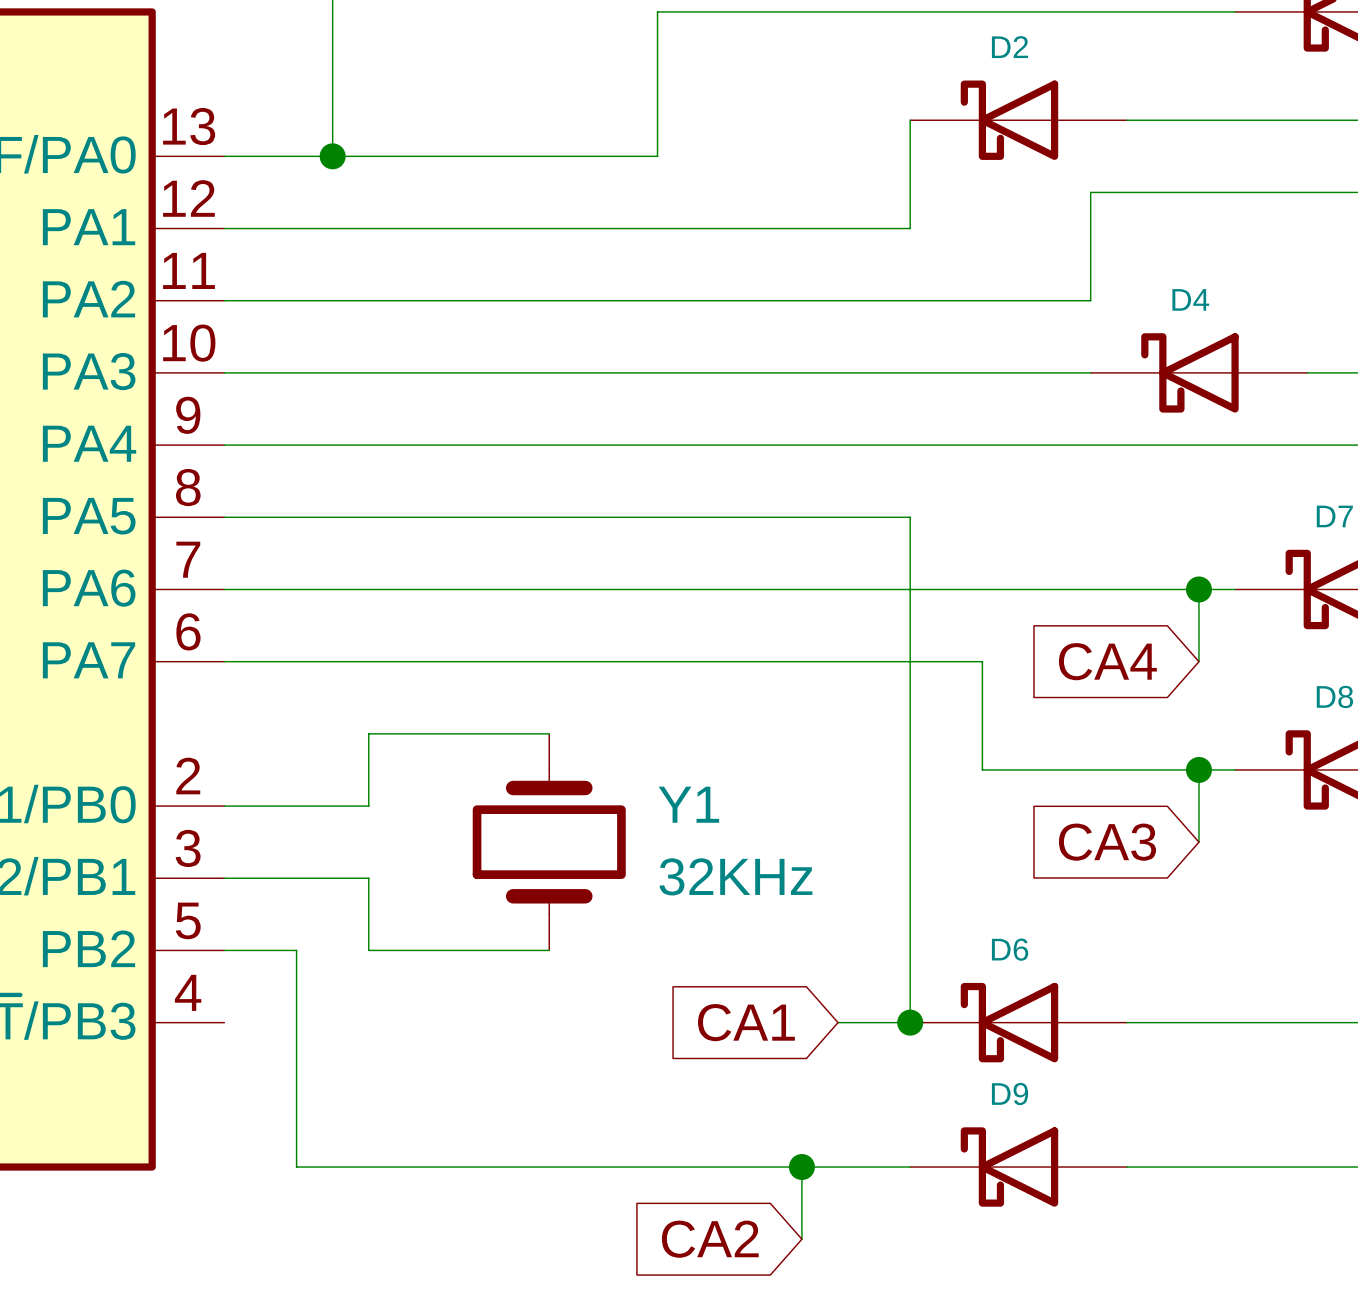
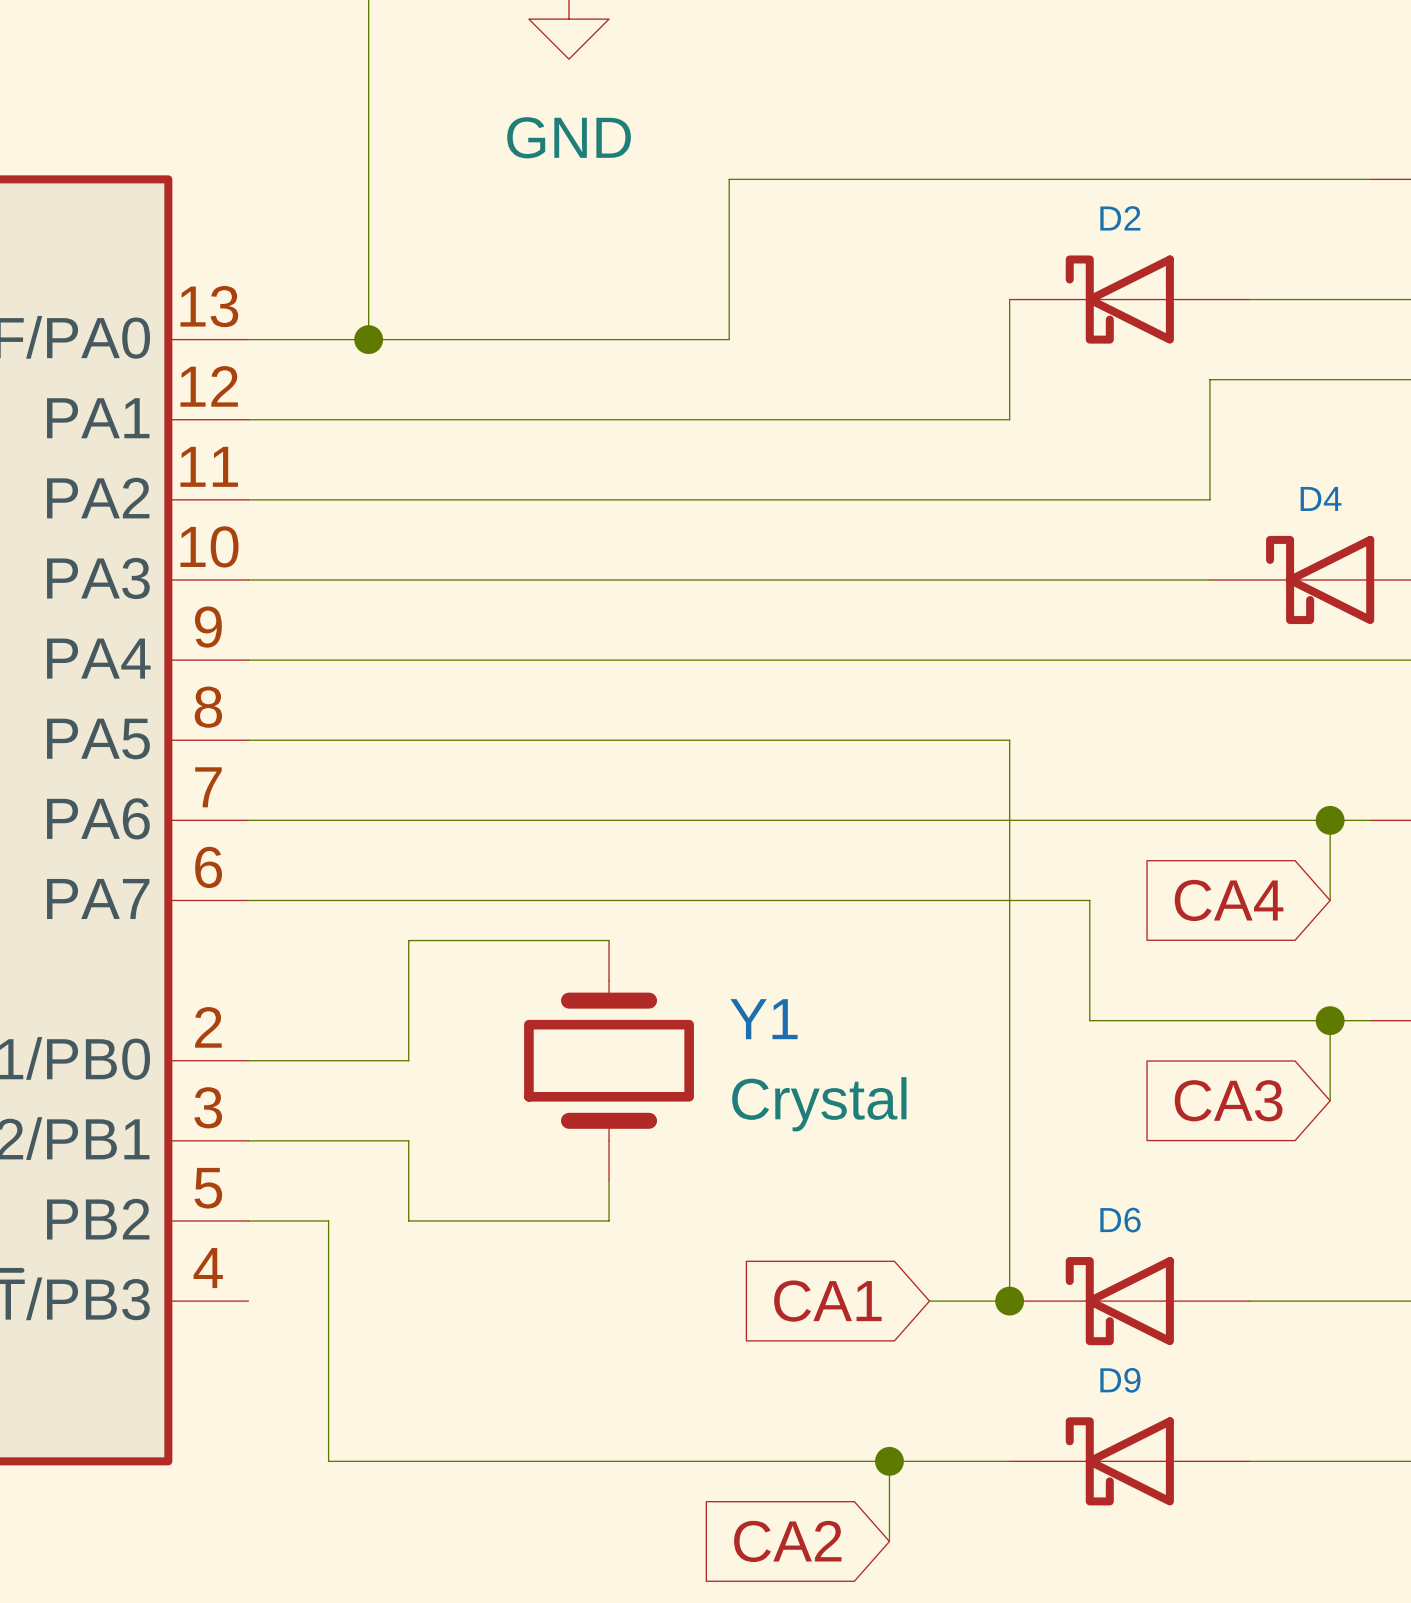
wire: (368, 733) (549, 733) -> (408, 980) (408, 940) (609, 940)
Y1 position: (549, 842) -> (609, 1060)
Y1 value: 32KHz (735, 876) -> Crystal (819, 1104)

